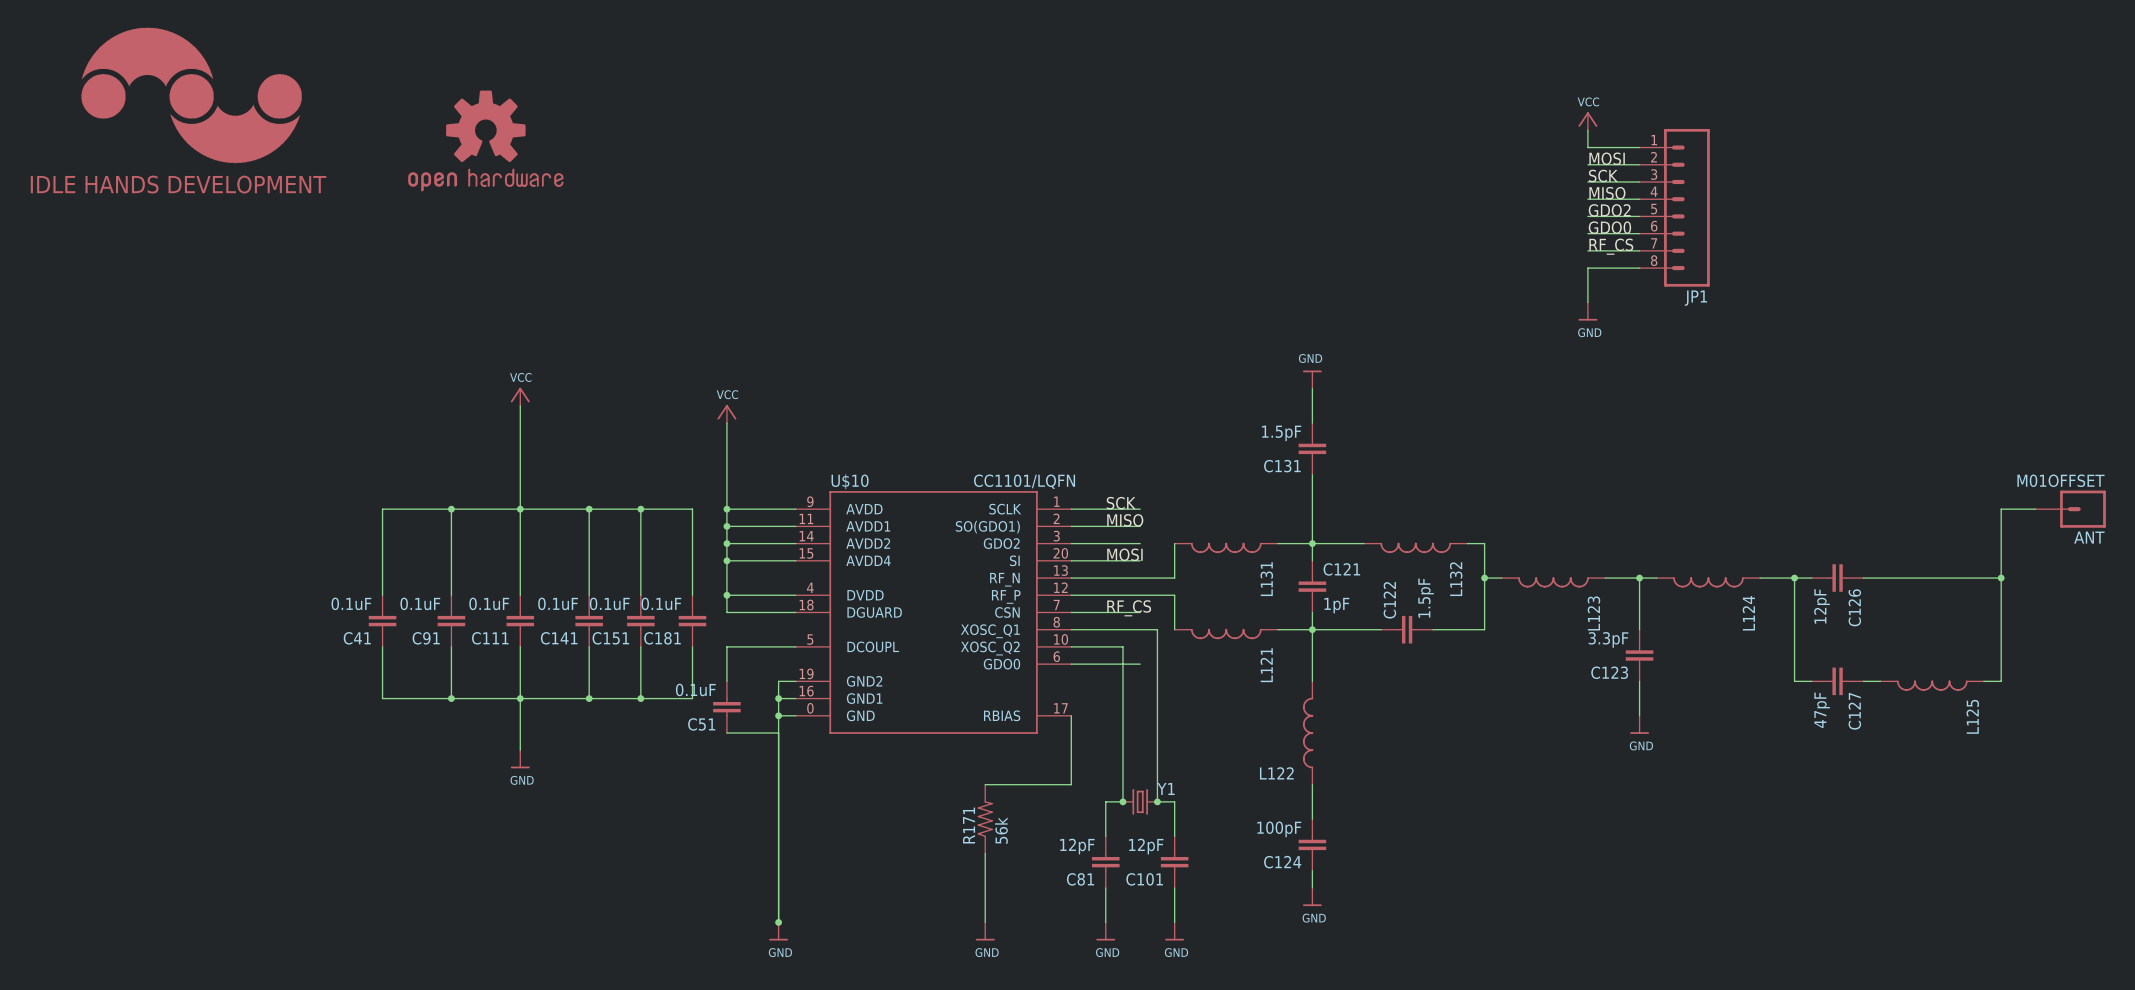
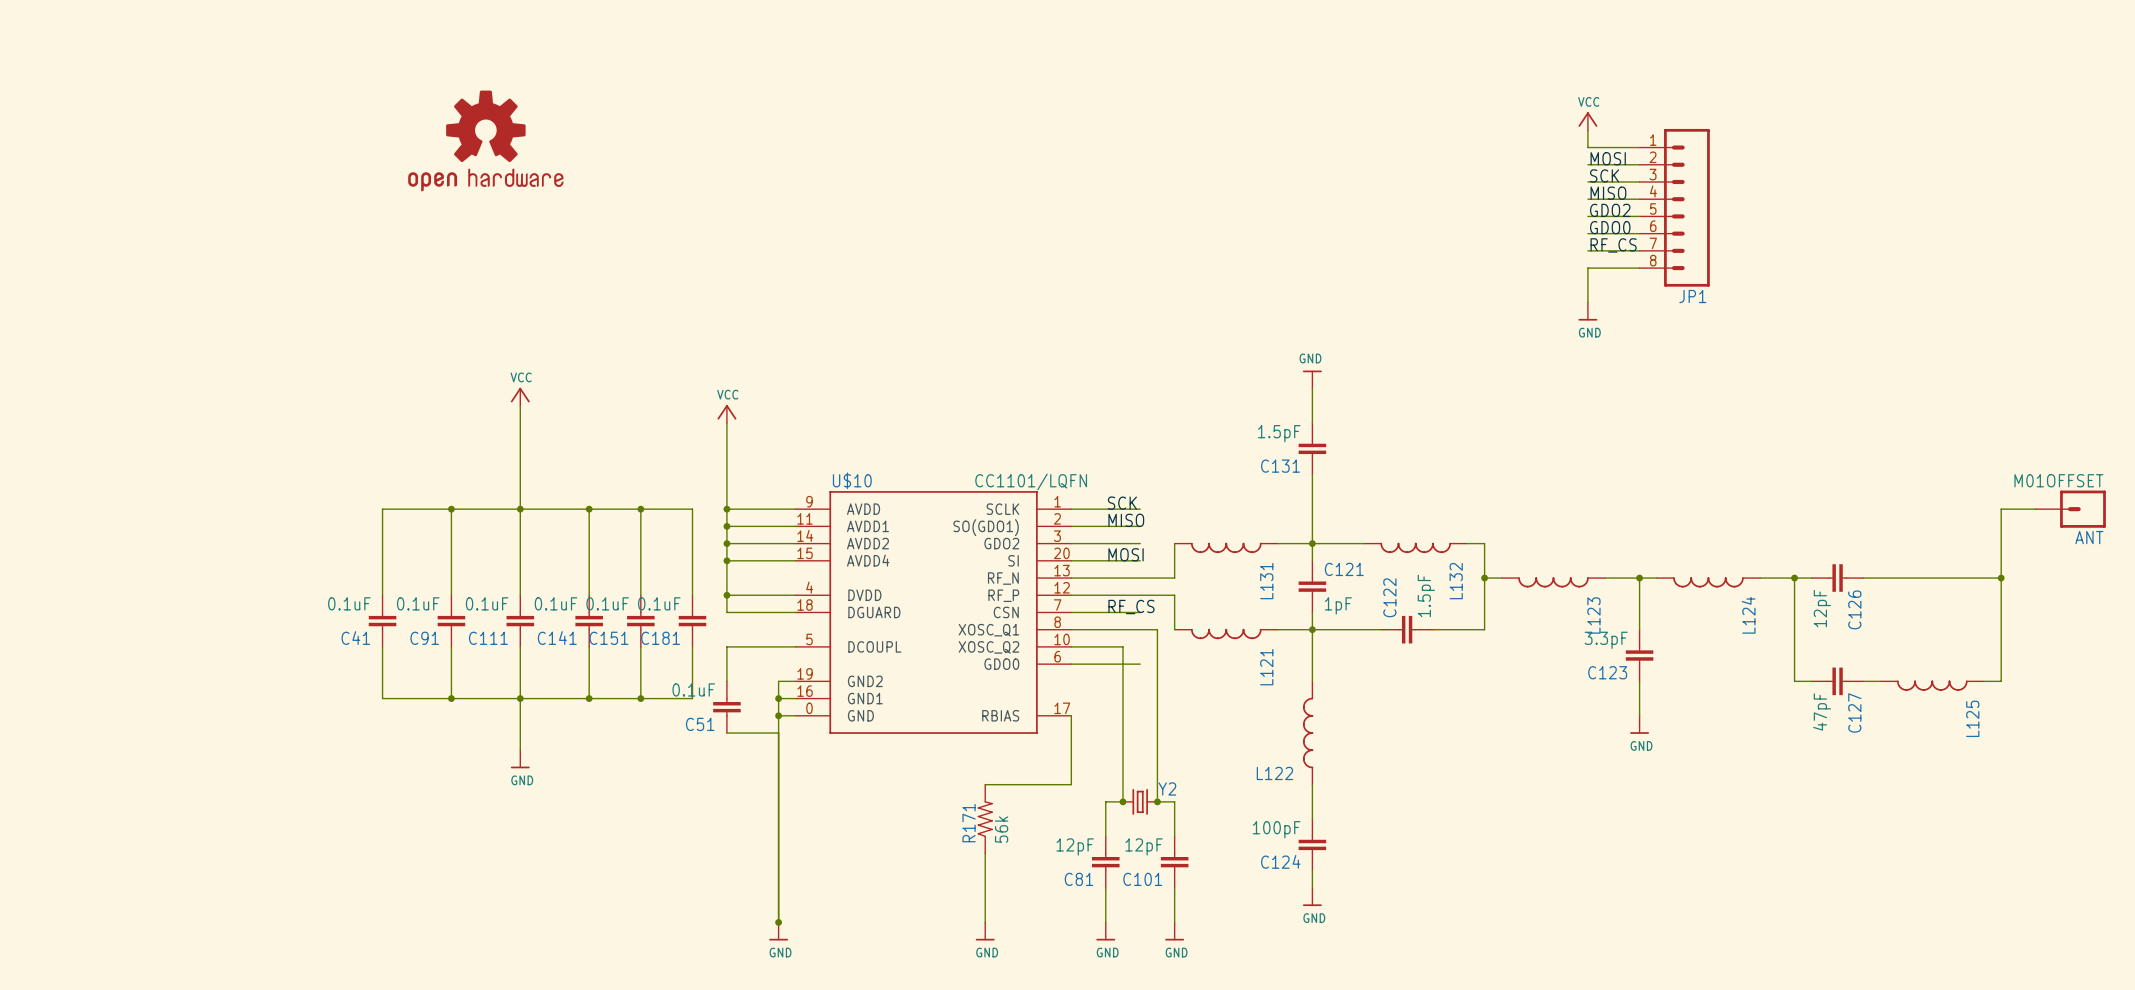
part: (191, 95) -> none
Y1 name: Y1 (1166, 788) -> Y2 (1167, 788)

